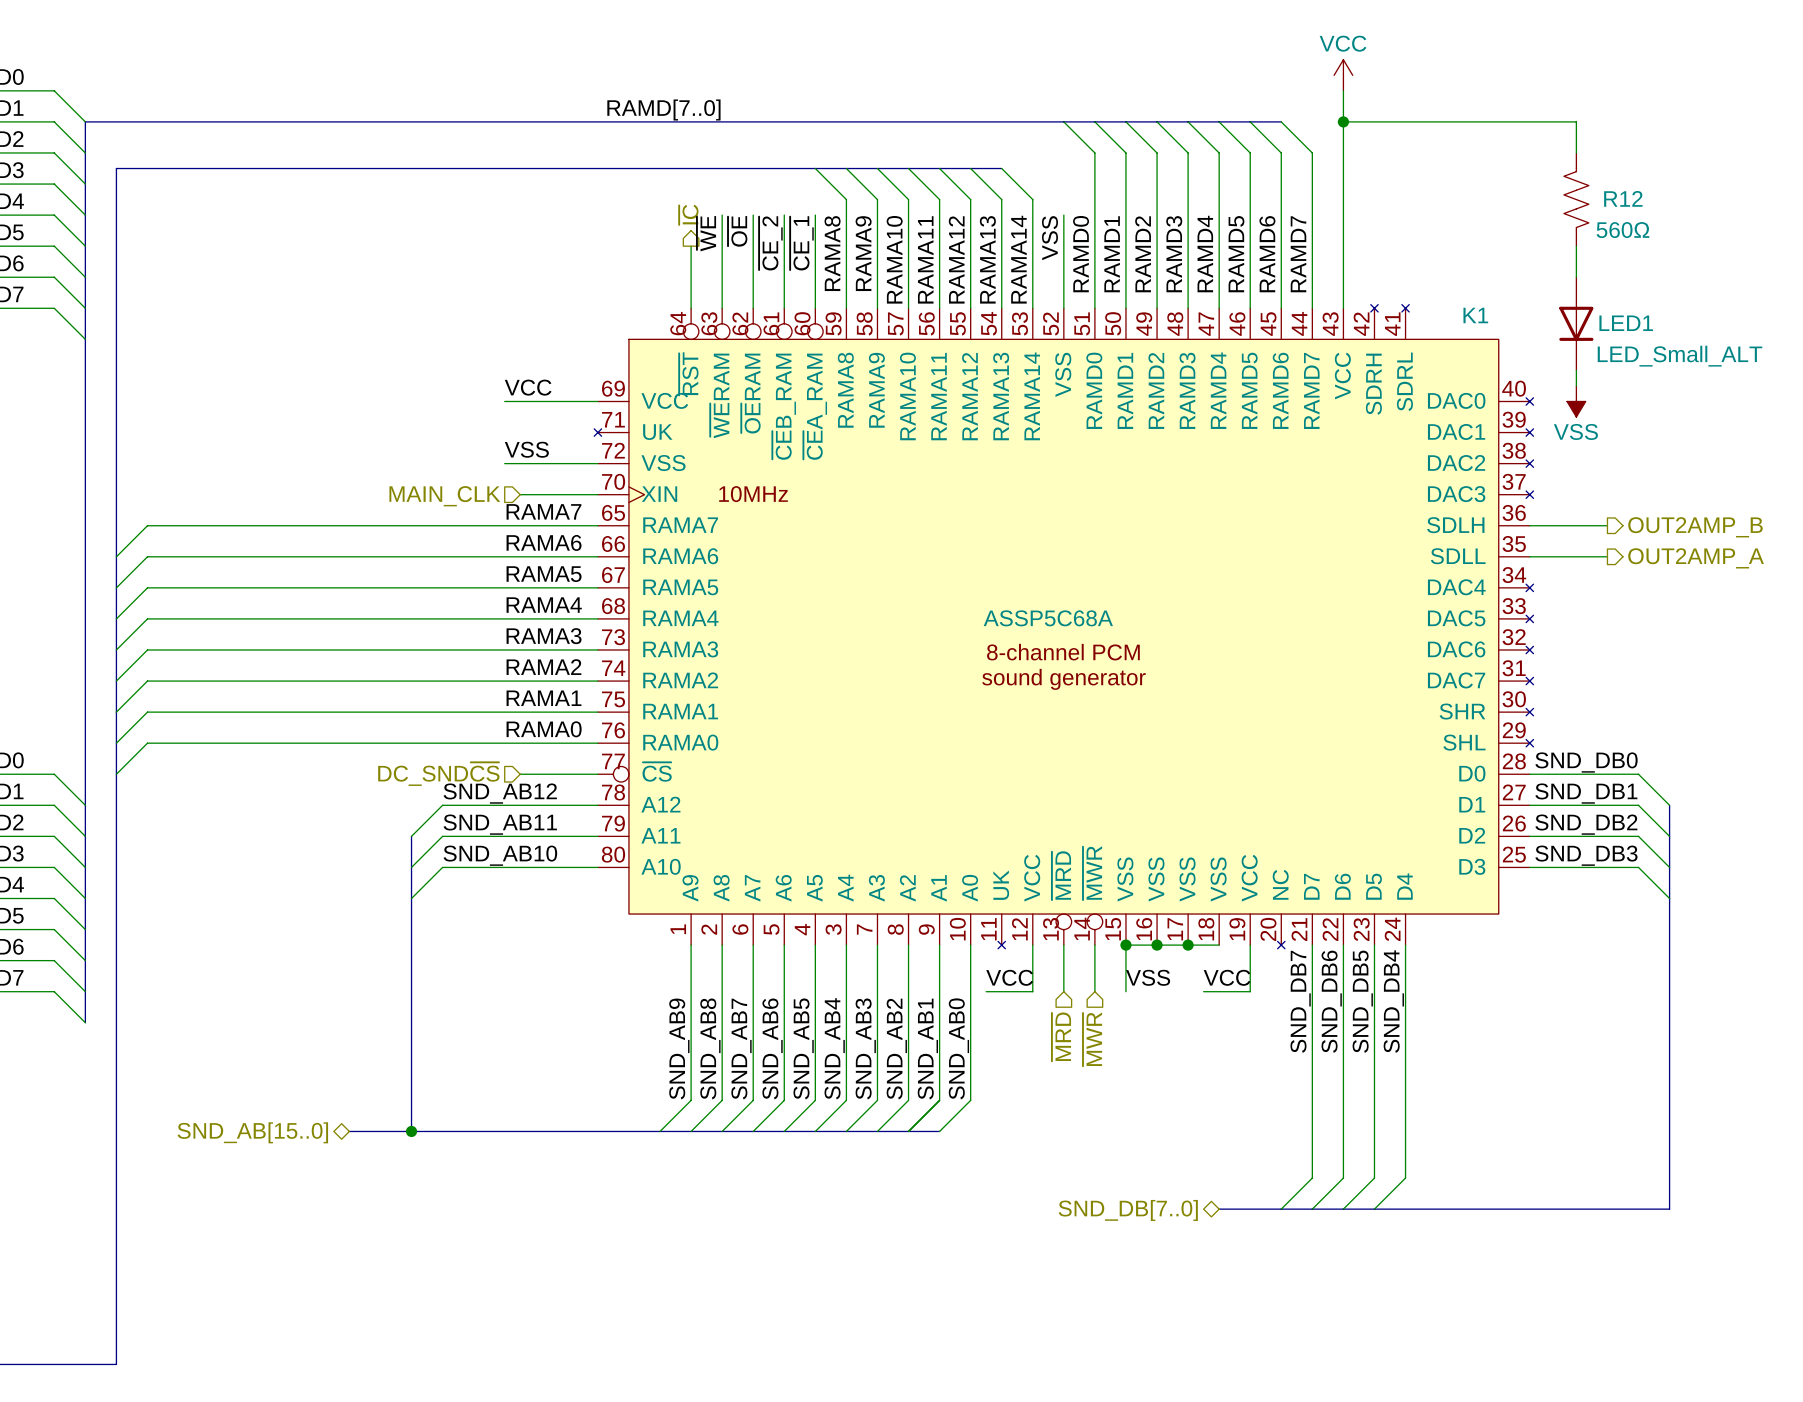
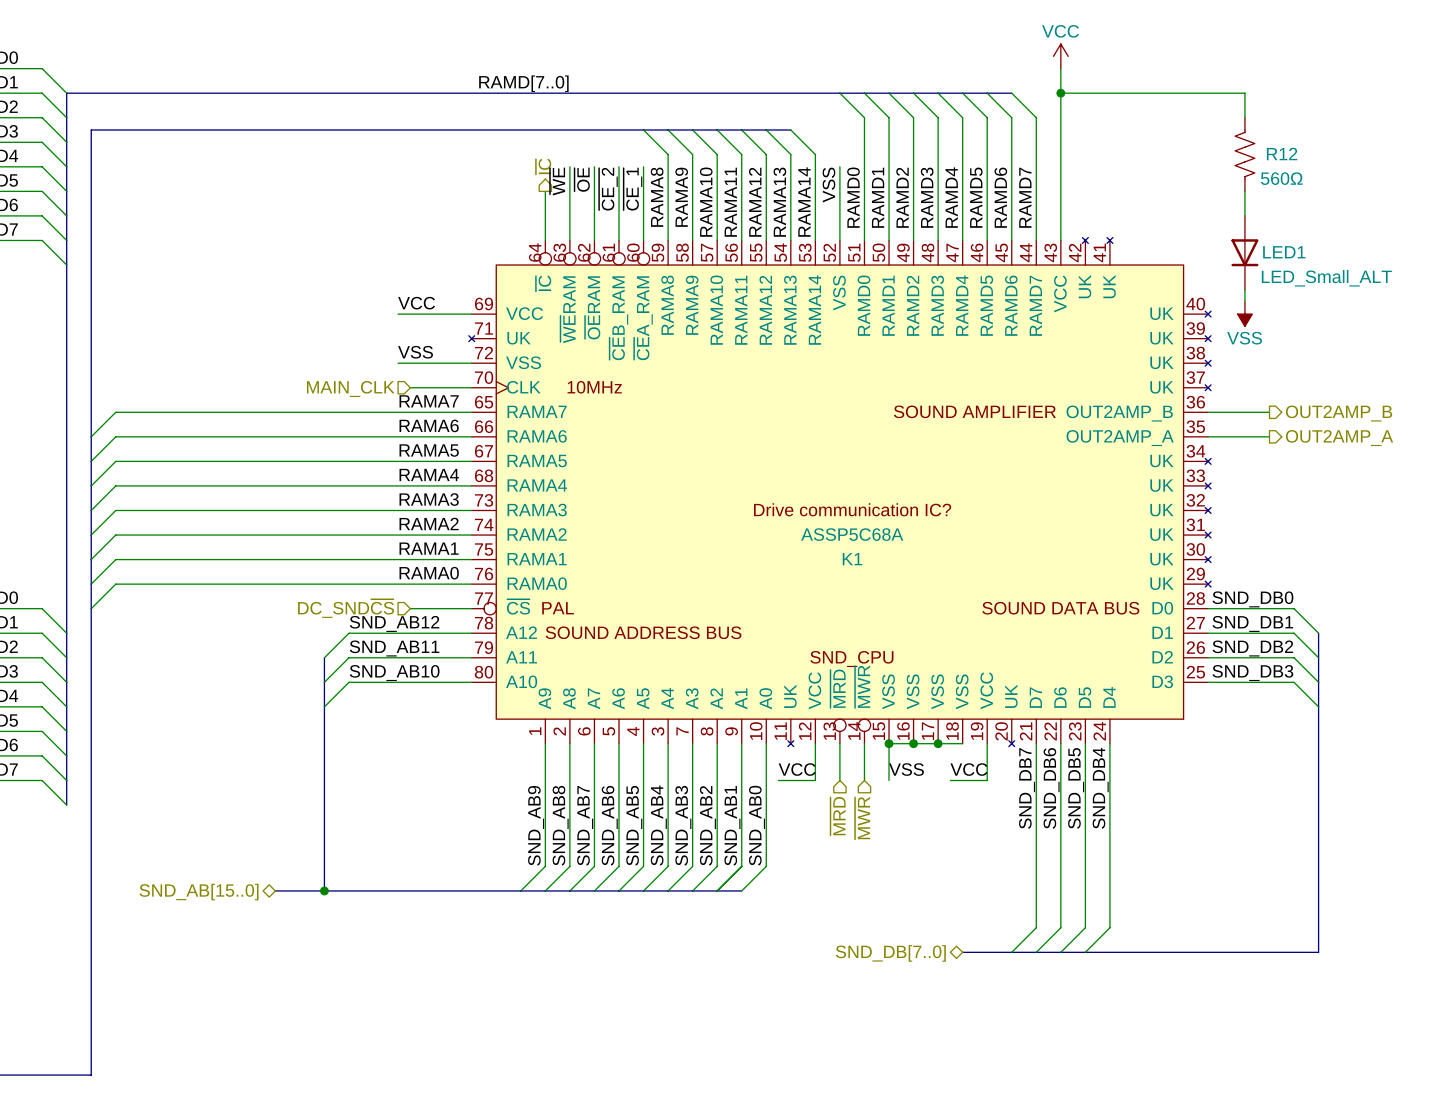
K1 symbol: [594, 304, 1534, 949] -> [468, 237, 1212, 747]
K1 name position: K1 (1475, 315) -> K1 (852, 559)
K1 value position: ASSP5C68A (1048, 618) -> ASSP5C68A (852, 534)

